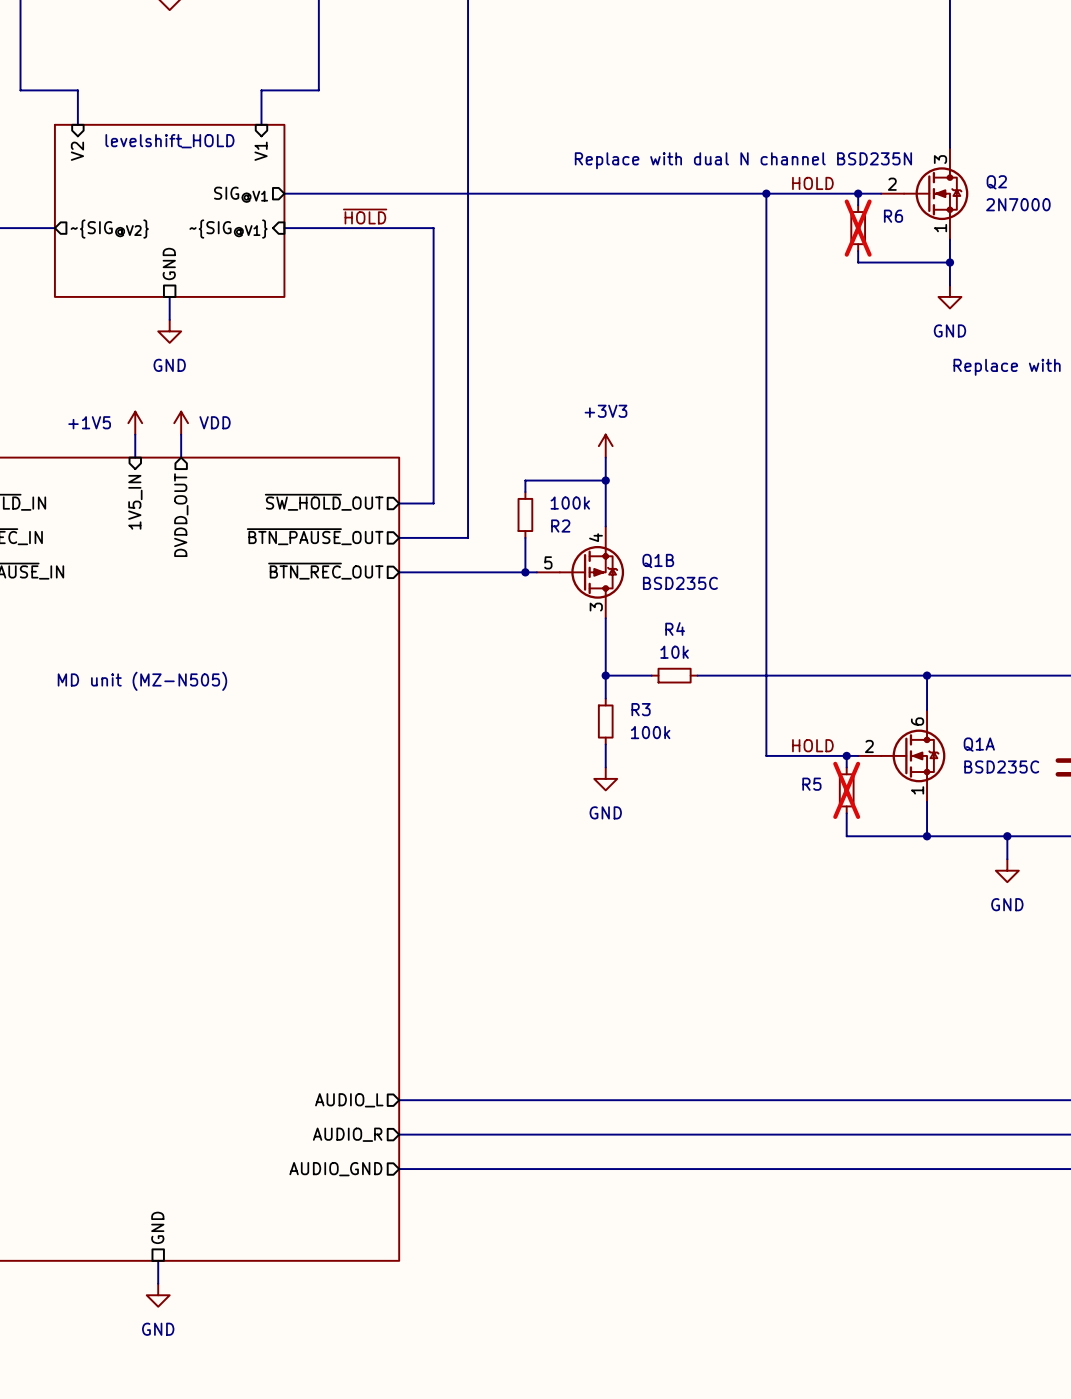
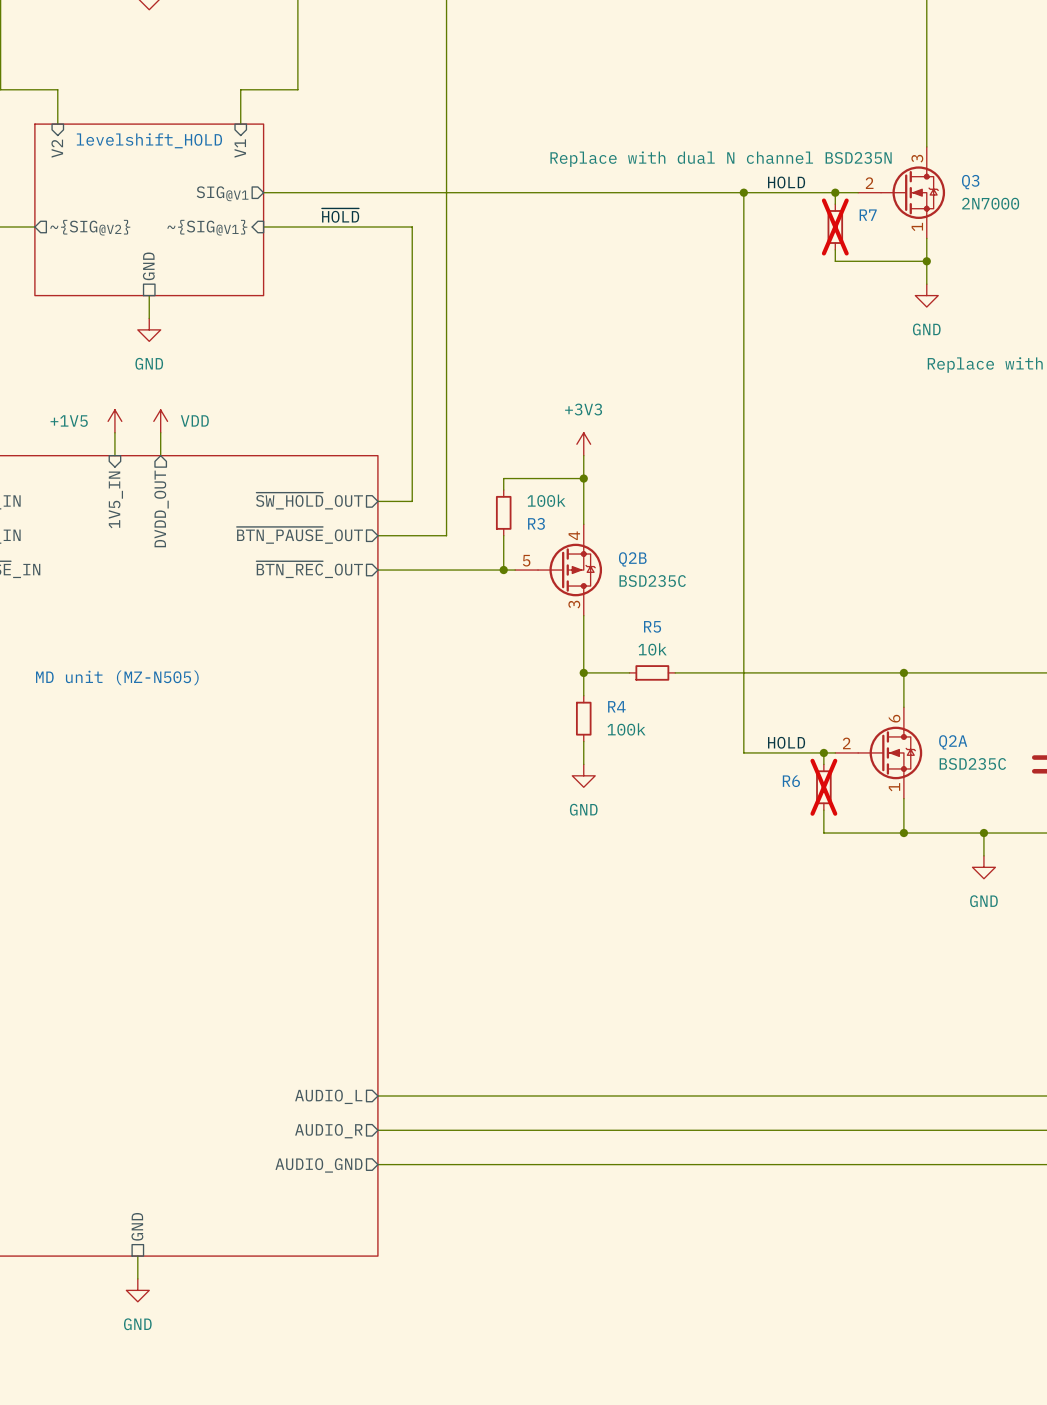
Q2 name: Q2 (996, 182) -> Q3 (970, 182)
R6 name: R6 (893, 216) -> R7 (868, 215)
R2 name: R2 (560, 526) -> R3 (536, 523)
Q1B name: Q1B (658, 560) -> Q2B (632, 559)
R4 name: R4 (675, 629) -> R5 (652, 626)
R3 name: R3 (641, 709) -> R4 (616, 706)
Q1A name: Q1A (979, 744) -> Q2A (953, 742)
R5 name: R5 (811, 784) -> R6 (791, 781)

